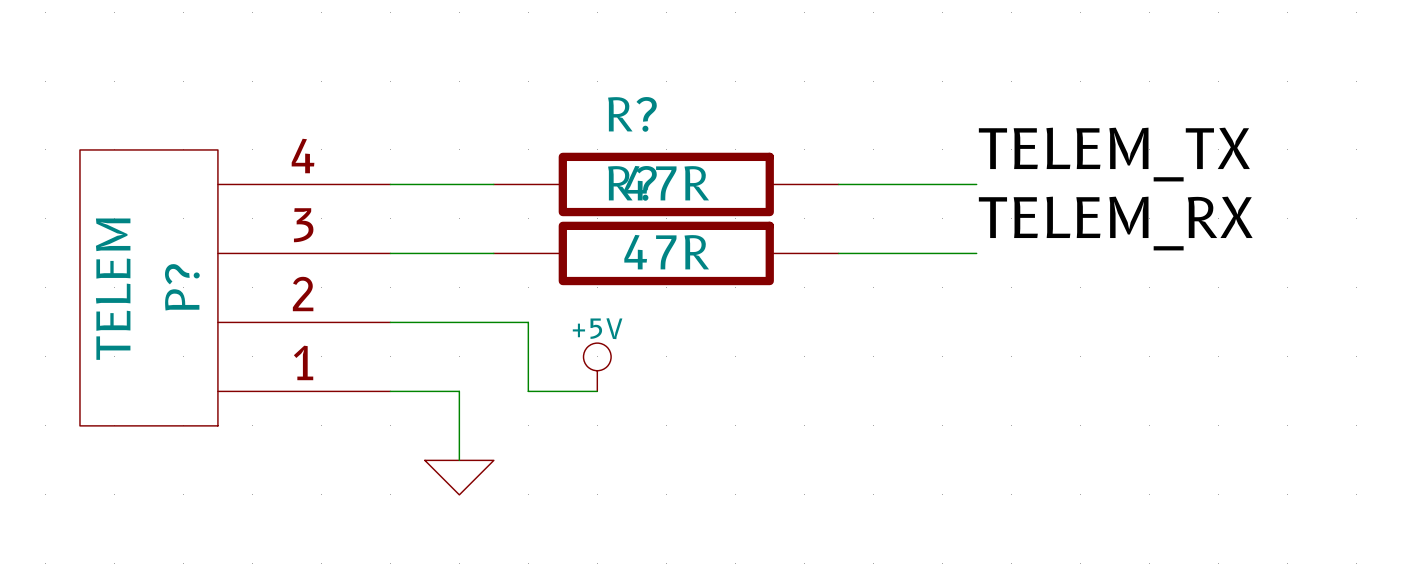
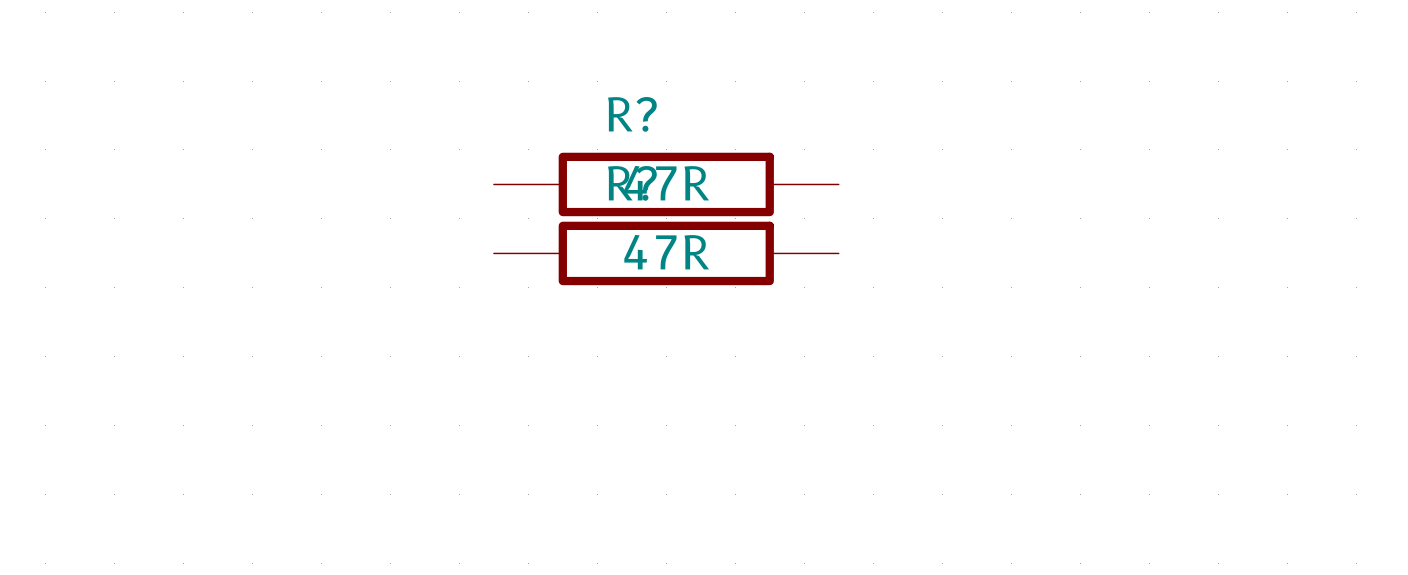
label: TELEM_TX (1114, 154) -> none
wire: (390, 184) (493, 184) -> none
wire: (838, 184) (976, 184) -> none
label: TELEM_RX (1115, 223) -> none
wire: (390, 253) (493, 253) -> none
wire: (838, 253) (976, 253) -> none
P?: TELEM (235, 287) -> none
wire: (390, 322) (528, 322) (528, 391) (597, 391) -> none
power symbol: +5V (597, 367) -> none
wire: (390, 391) (459, 391) (459, 460) -> none
power symbol: (459, 477) -> none

